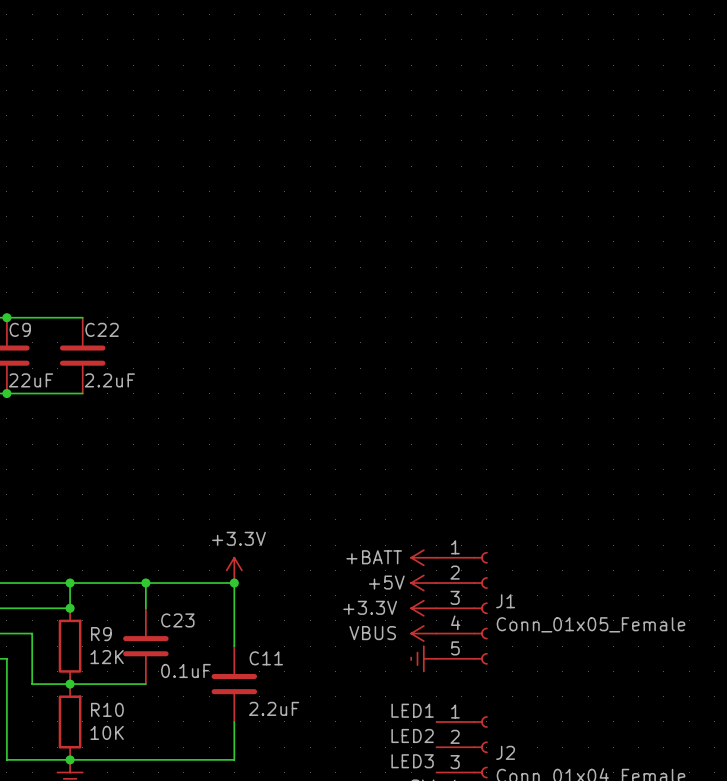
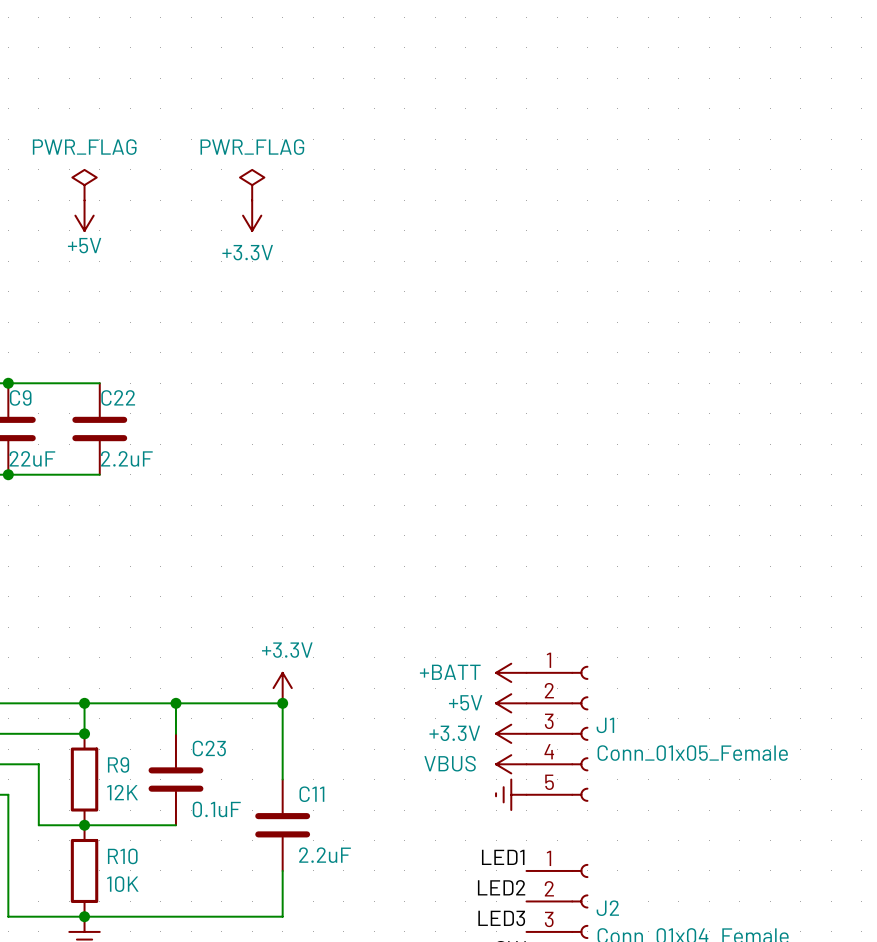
power symbol: none -> PWR_FLAG (84, 185)
power symbol: none -> PWR_FLAG (252, 185)
power symbol: none -> +5V (84, 215)
power symbol: none -> +3.3V (252, 215)

